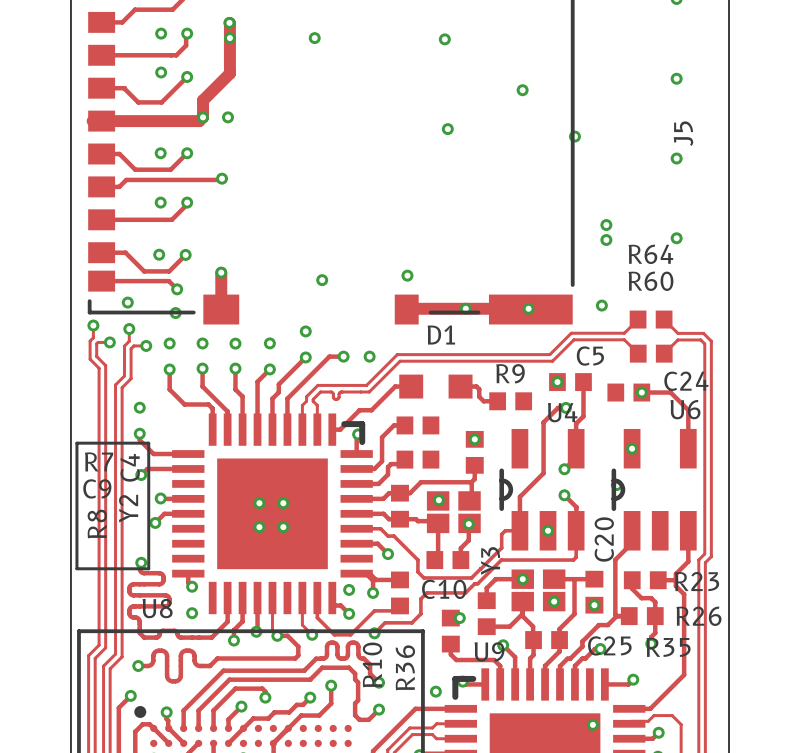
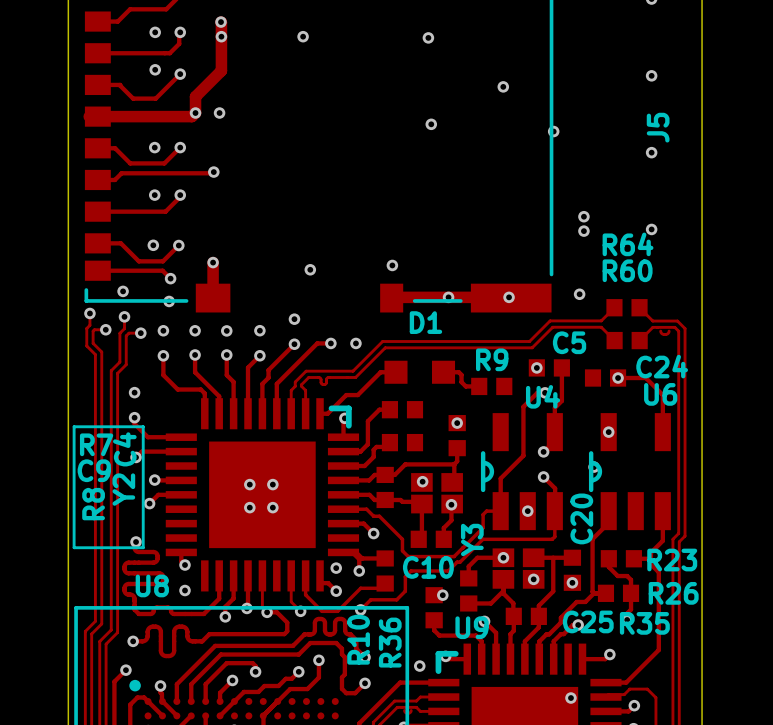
track: none -> (660, 331) (664, 334) (669, 331)
track: none -> (404, 710) (407, 713) (411, 710)

